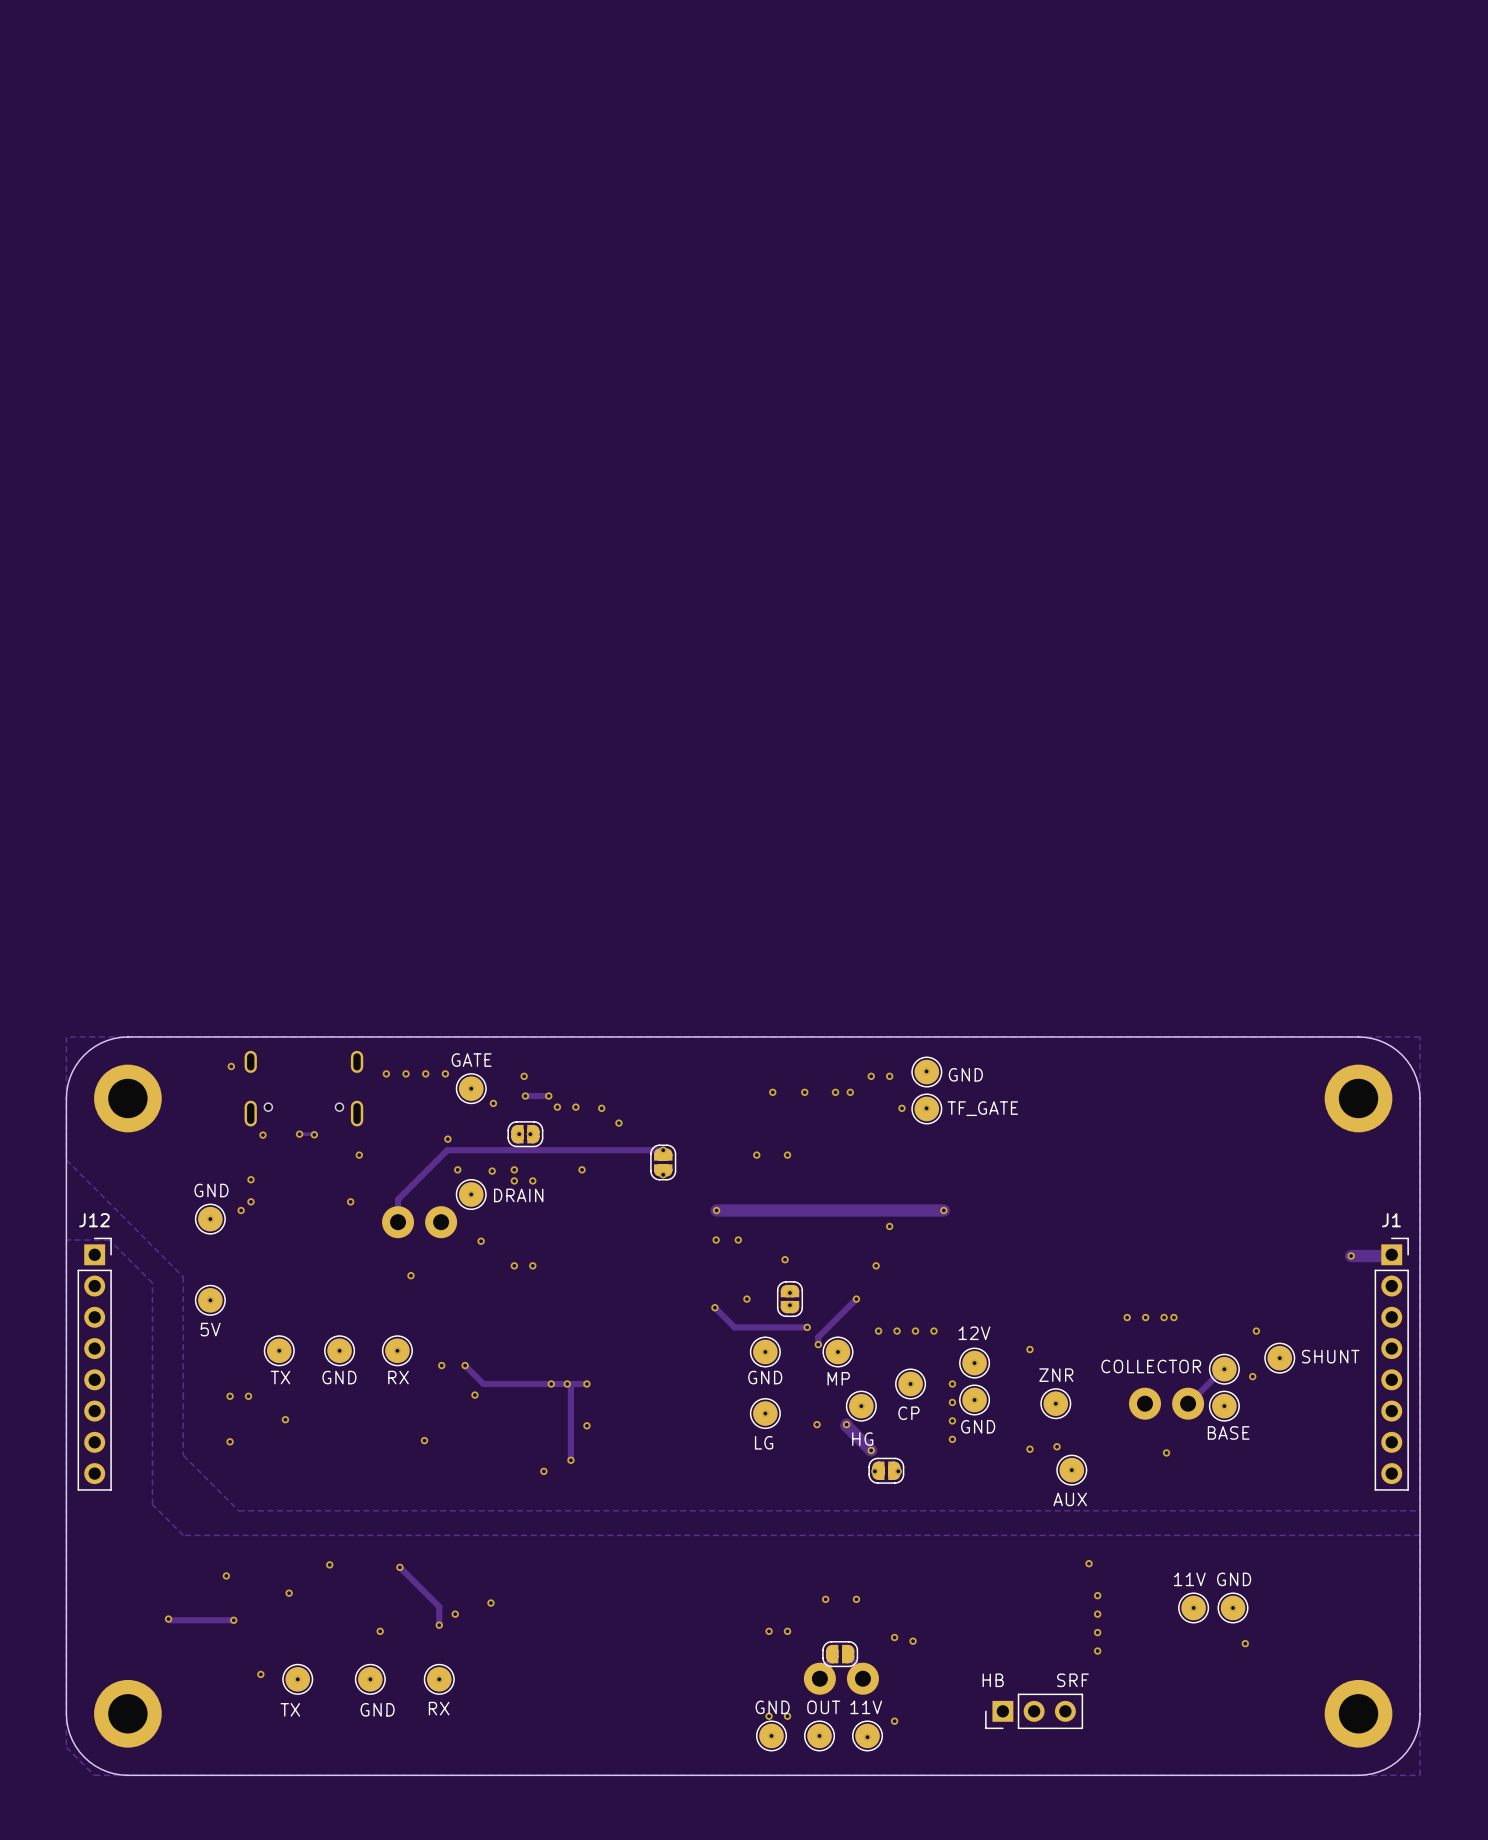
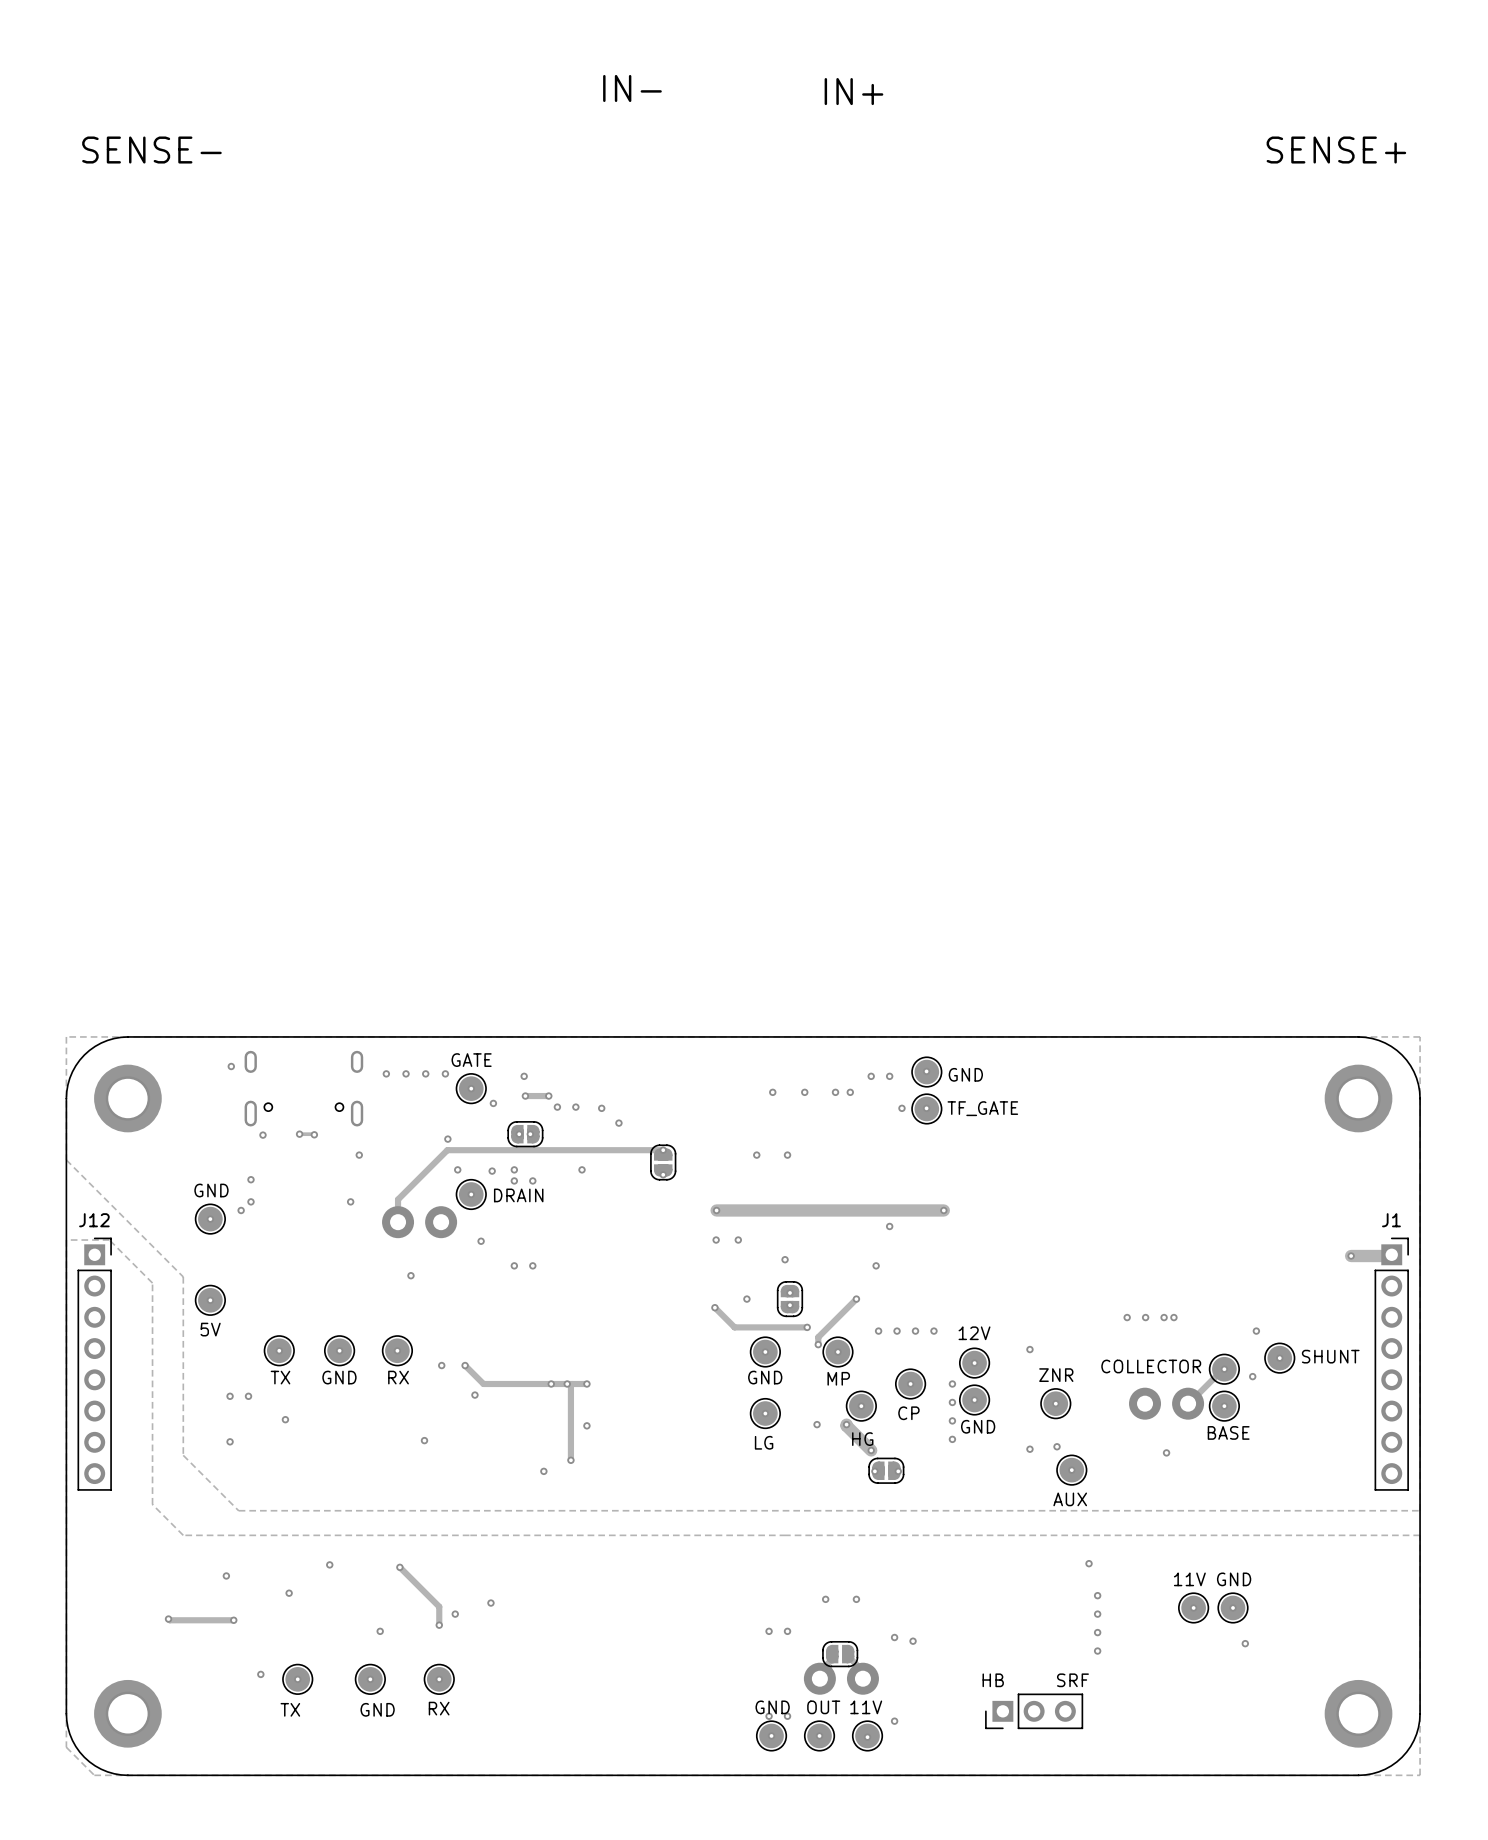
text: none -> IN- (632, 88)
text: none -> IN+ (853, 91)
text: none -> SENSE- (151, 150)
text: none -> SENSE+ (1336, 150)

